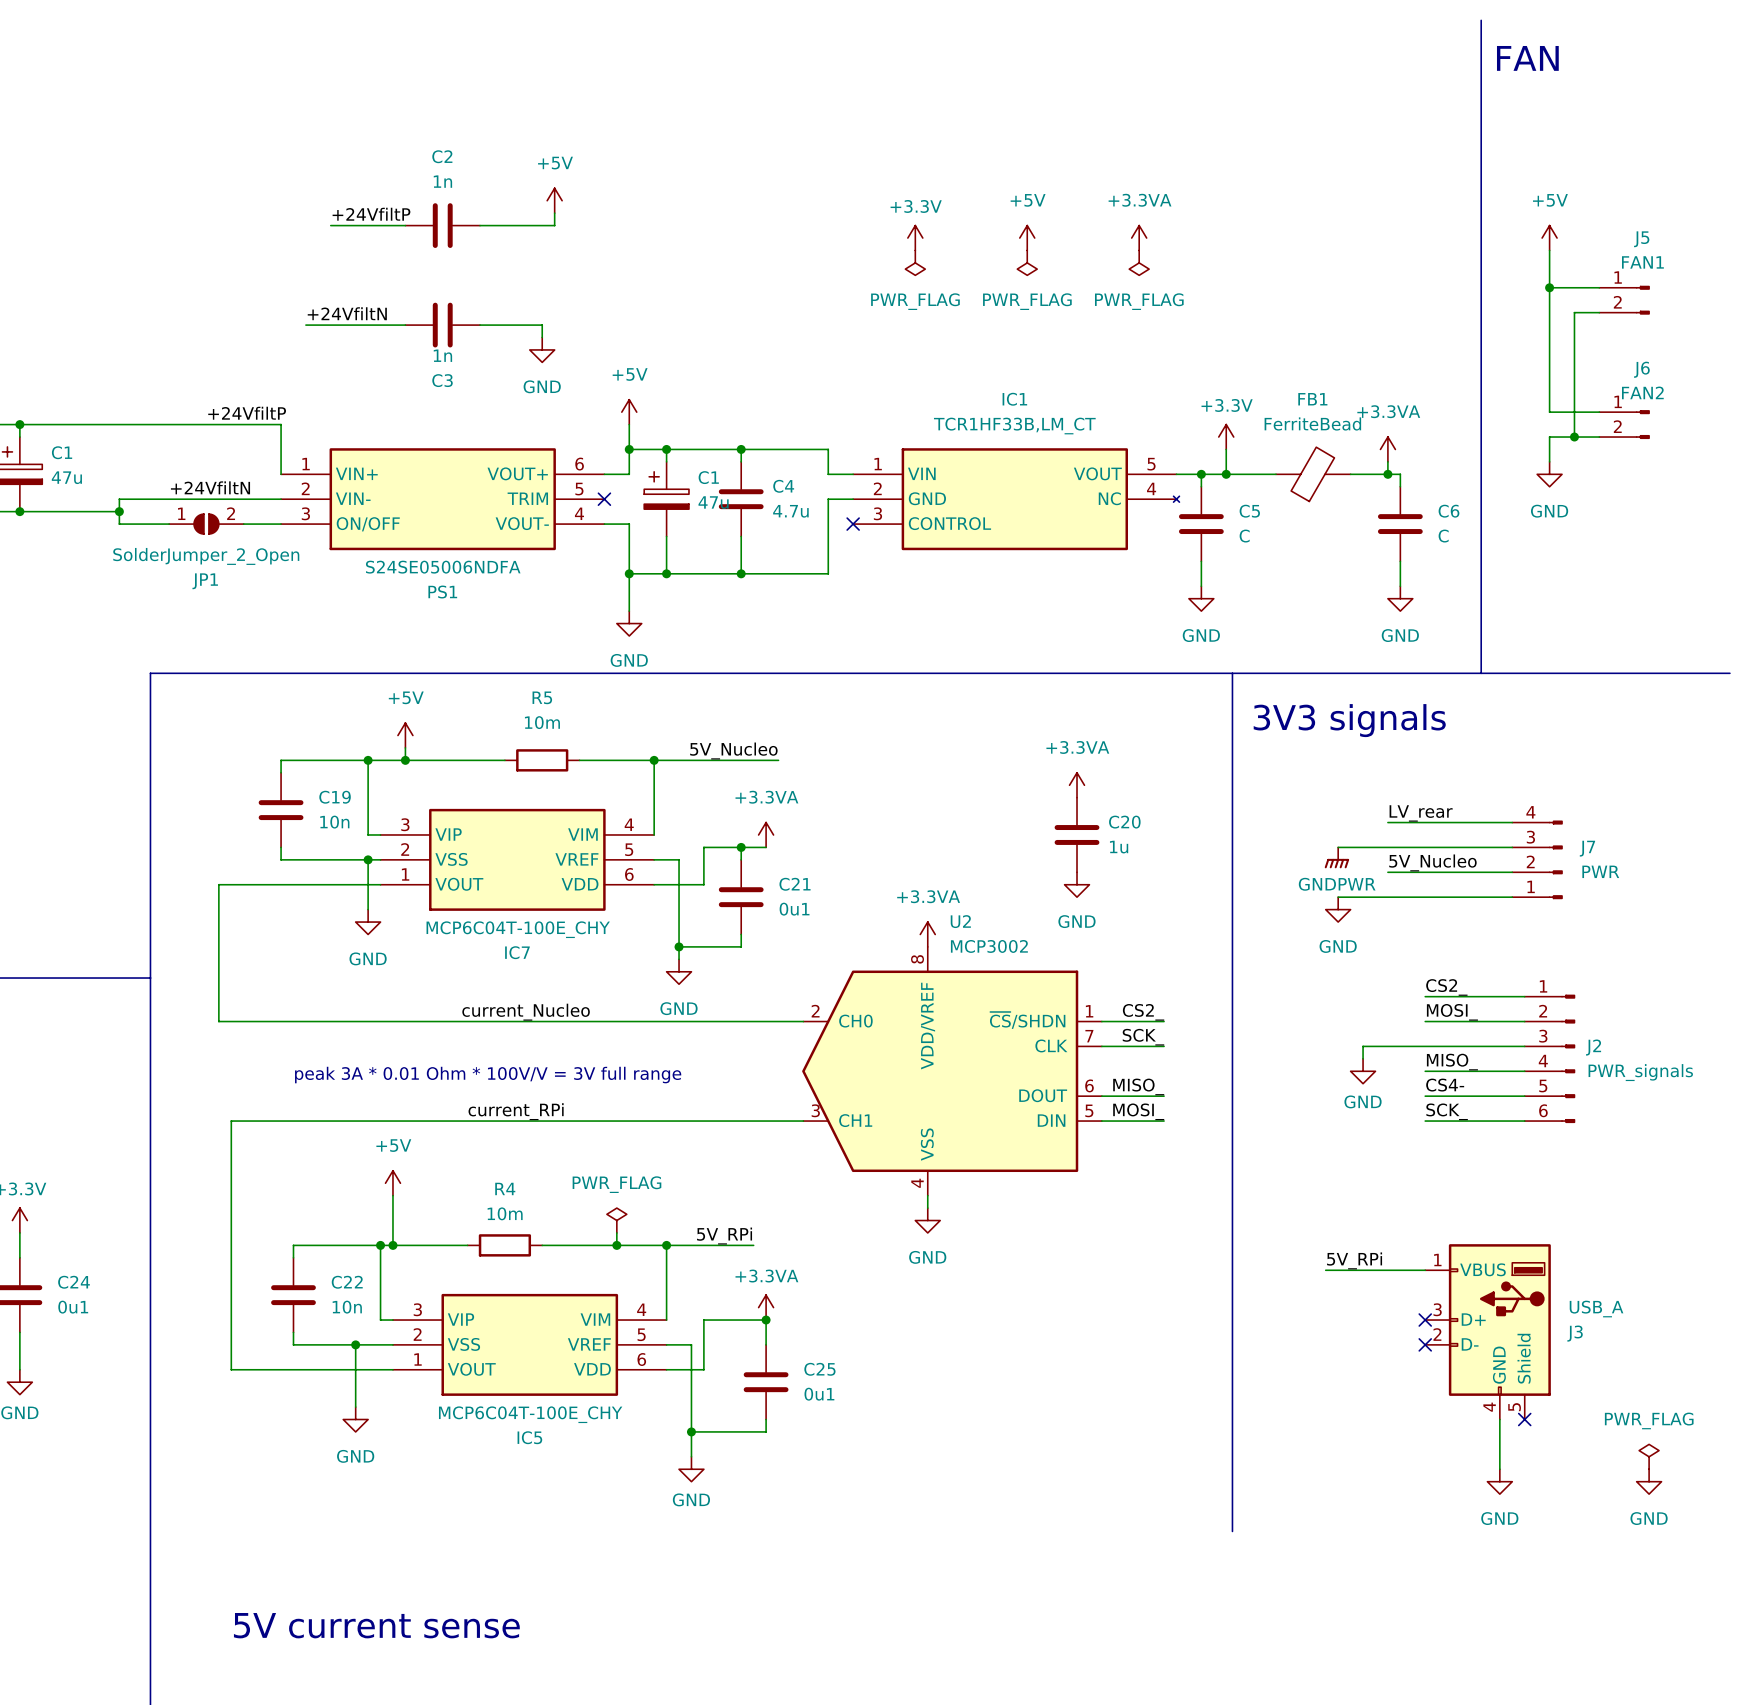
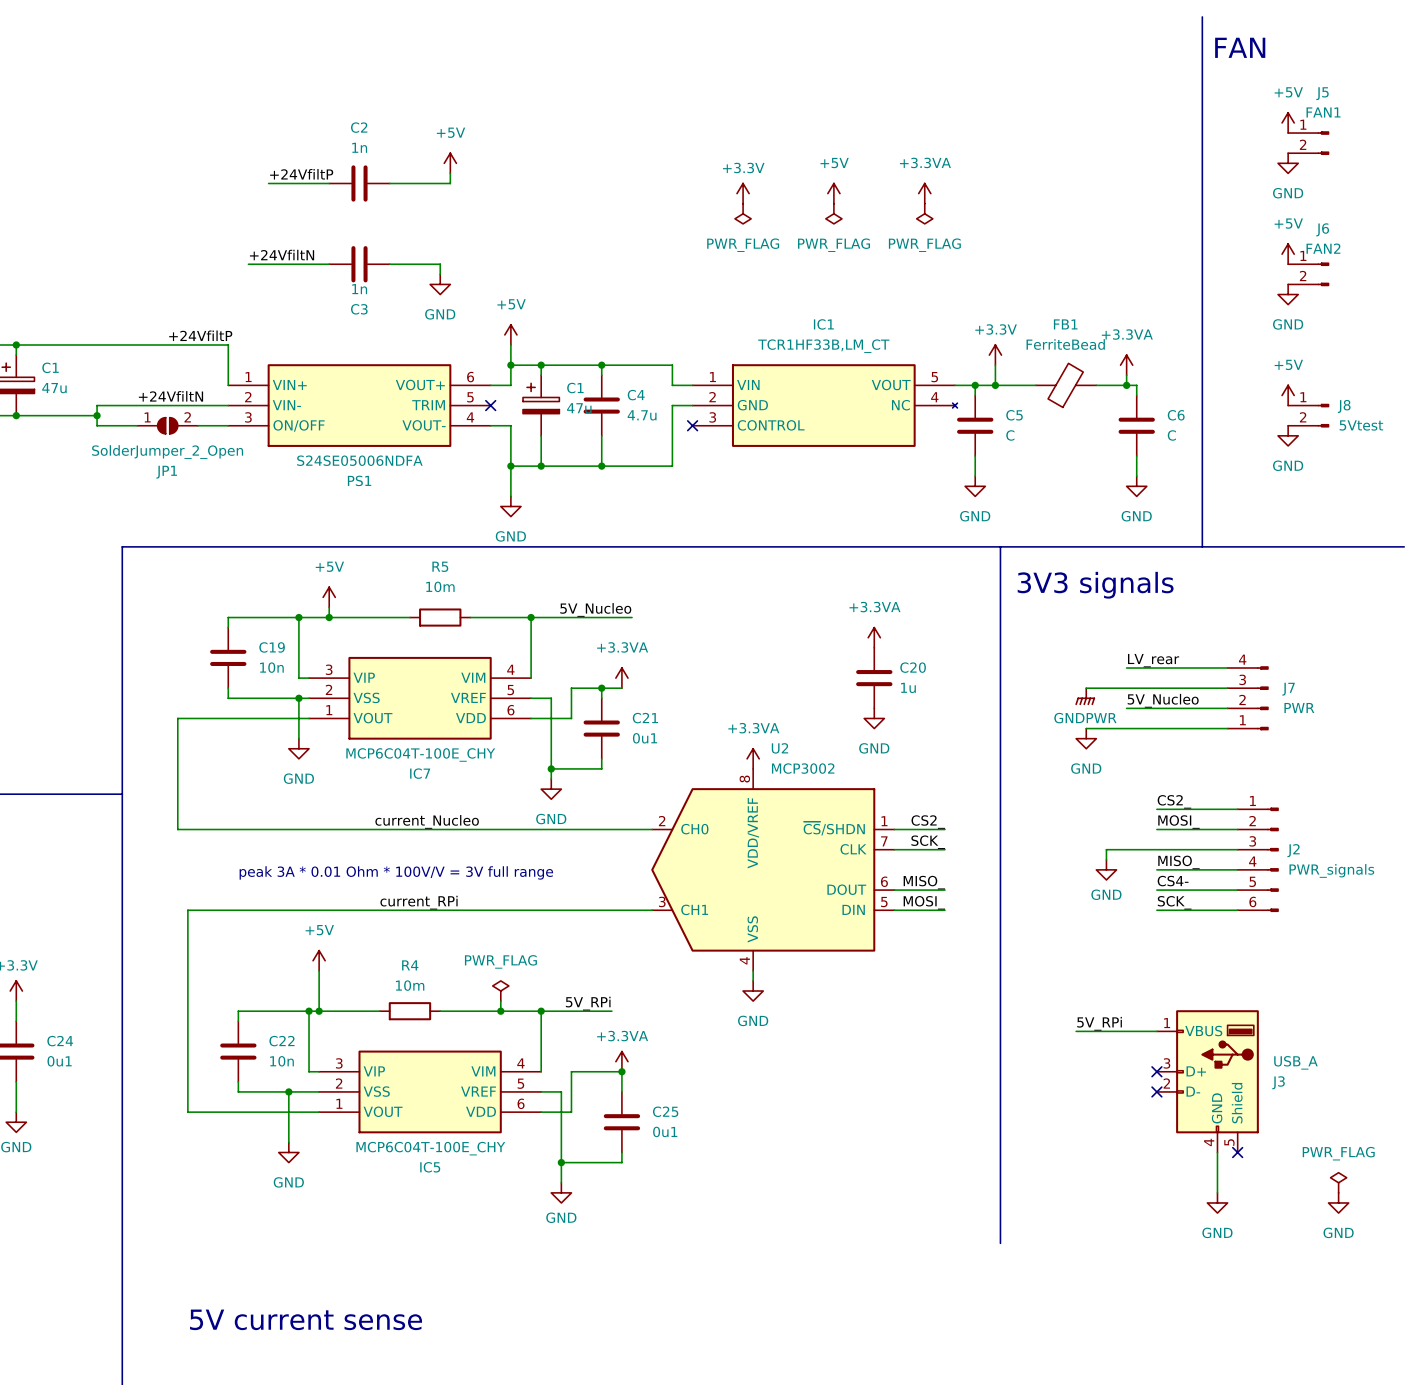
power symbol: none -> +5V (1288, 122)
power symbol: none -> GND (1288, 163)
power symbol: +5V (1549, 238) -> none
wire: (1549, 250) (1549, 412) (1599, 412) -> none
wire: (1549, 287) (1599, 287) -> none
junction: (1549, 287) -> none
J5 position: (1624, 300) -> (1308, 143)
power symbol: none -> +5V (1288, 254)
wire: (1599, 312) (1574, 312) (1574, 437) -> none
power symbol: none -> GND (1288, 294)
J6 position: (1624, 424) -> (1308, 274)
junction: (1574, 437) -> none
wire: (1599, 437) (1549, 437) (1549, 461) -> none
power symbol: GND (1549, 474) -> none
power symbol: none -> +5V (1288, 395)
J8: none -> 5Vtest (1308, 415)
power symbol: none -> GND (1288, 435)

